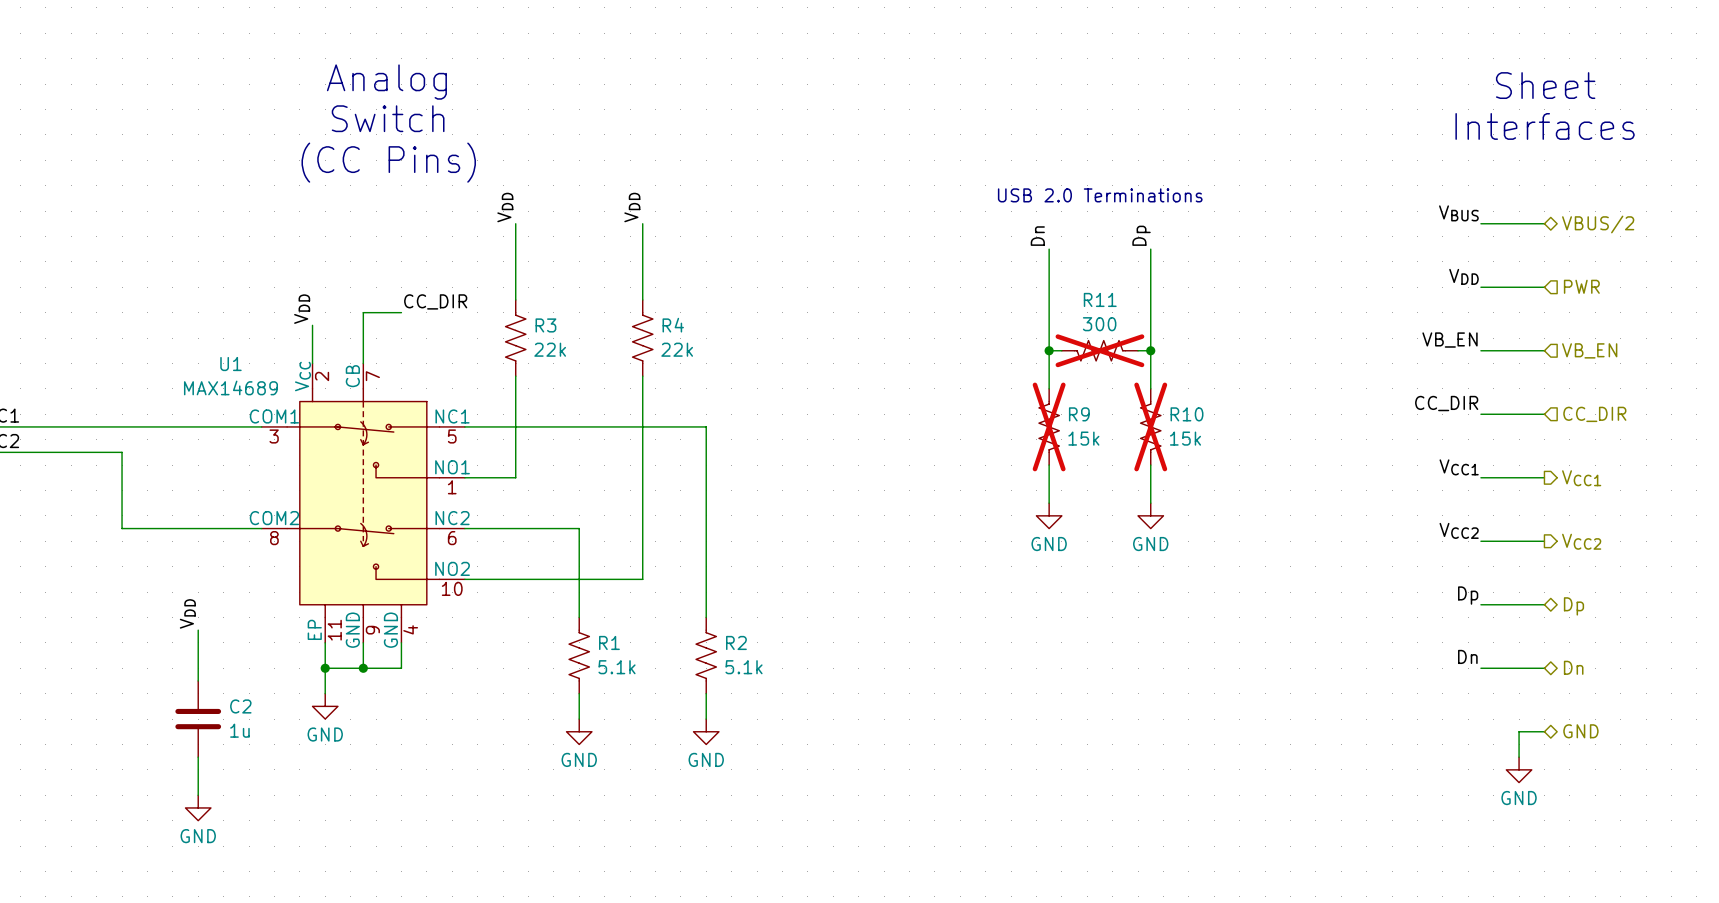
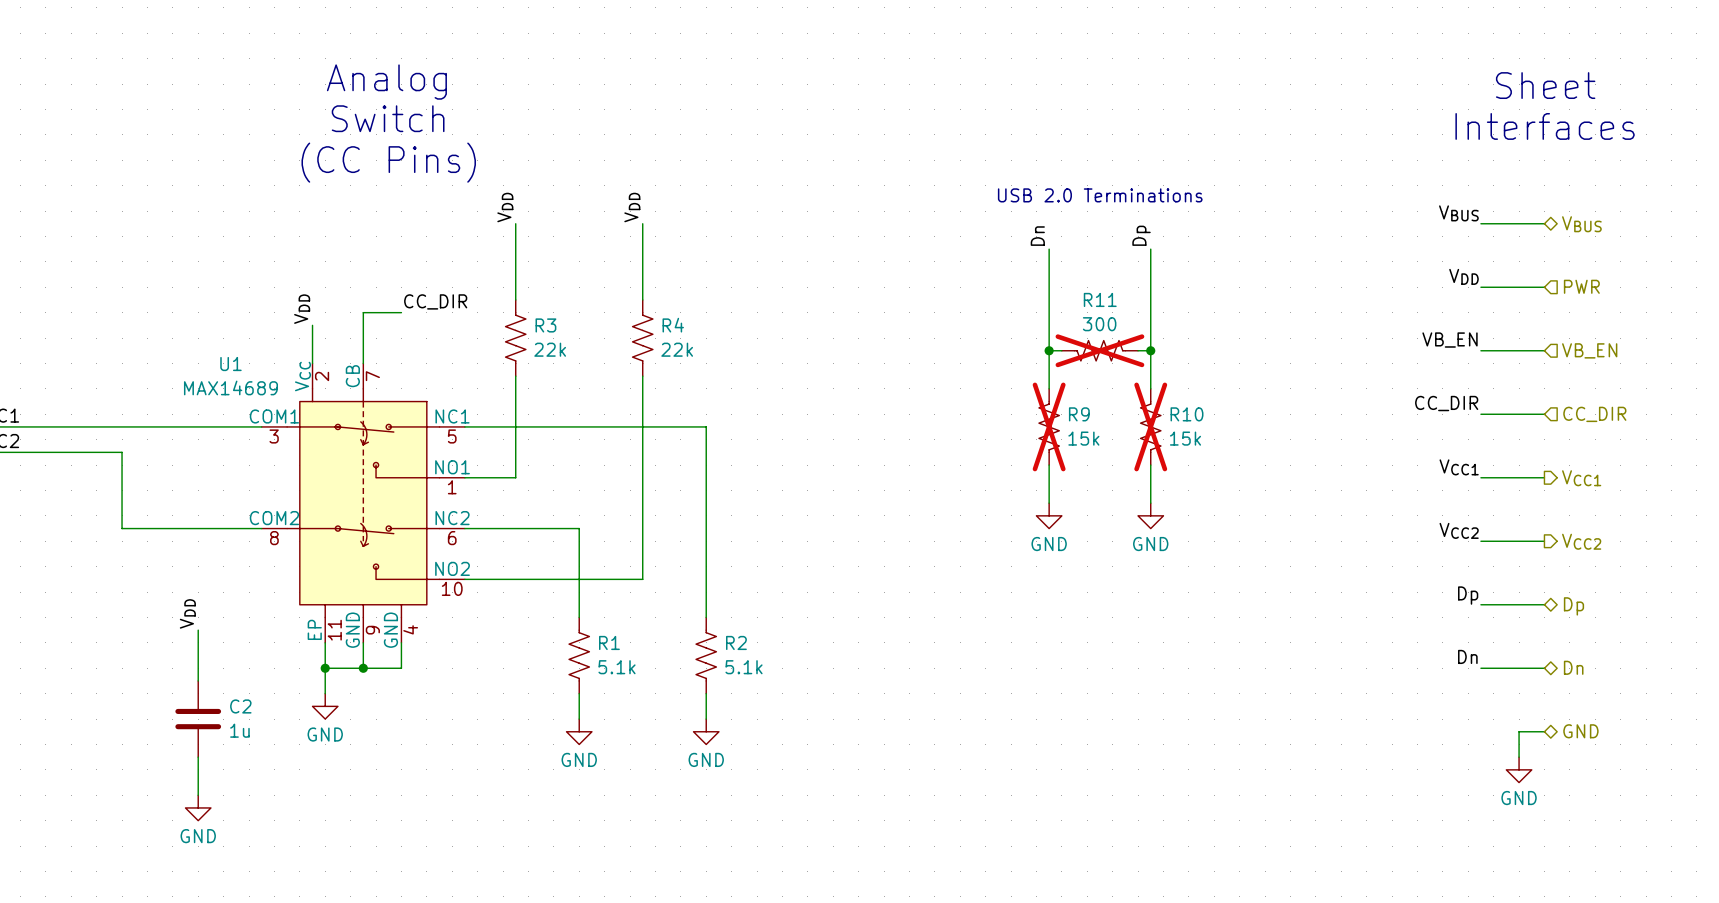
hierarchical label: VBUS/2 (1598, 224) -> VBUS (1581, 224)

